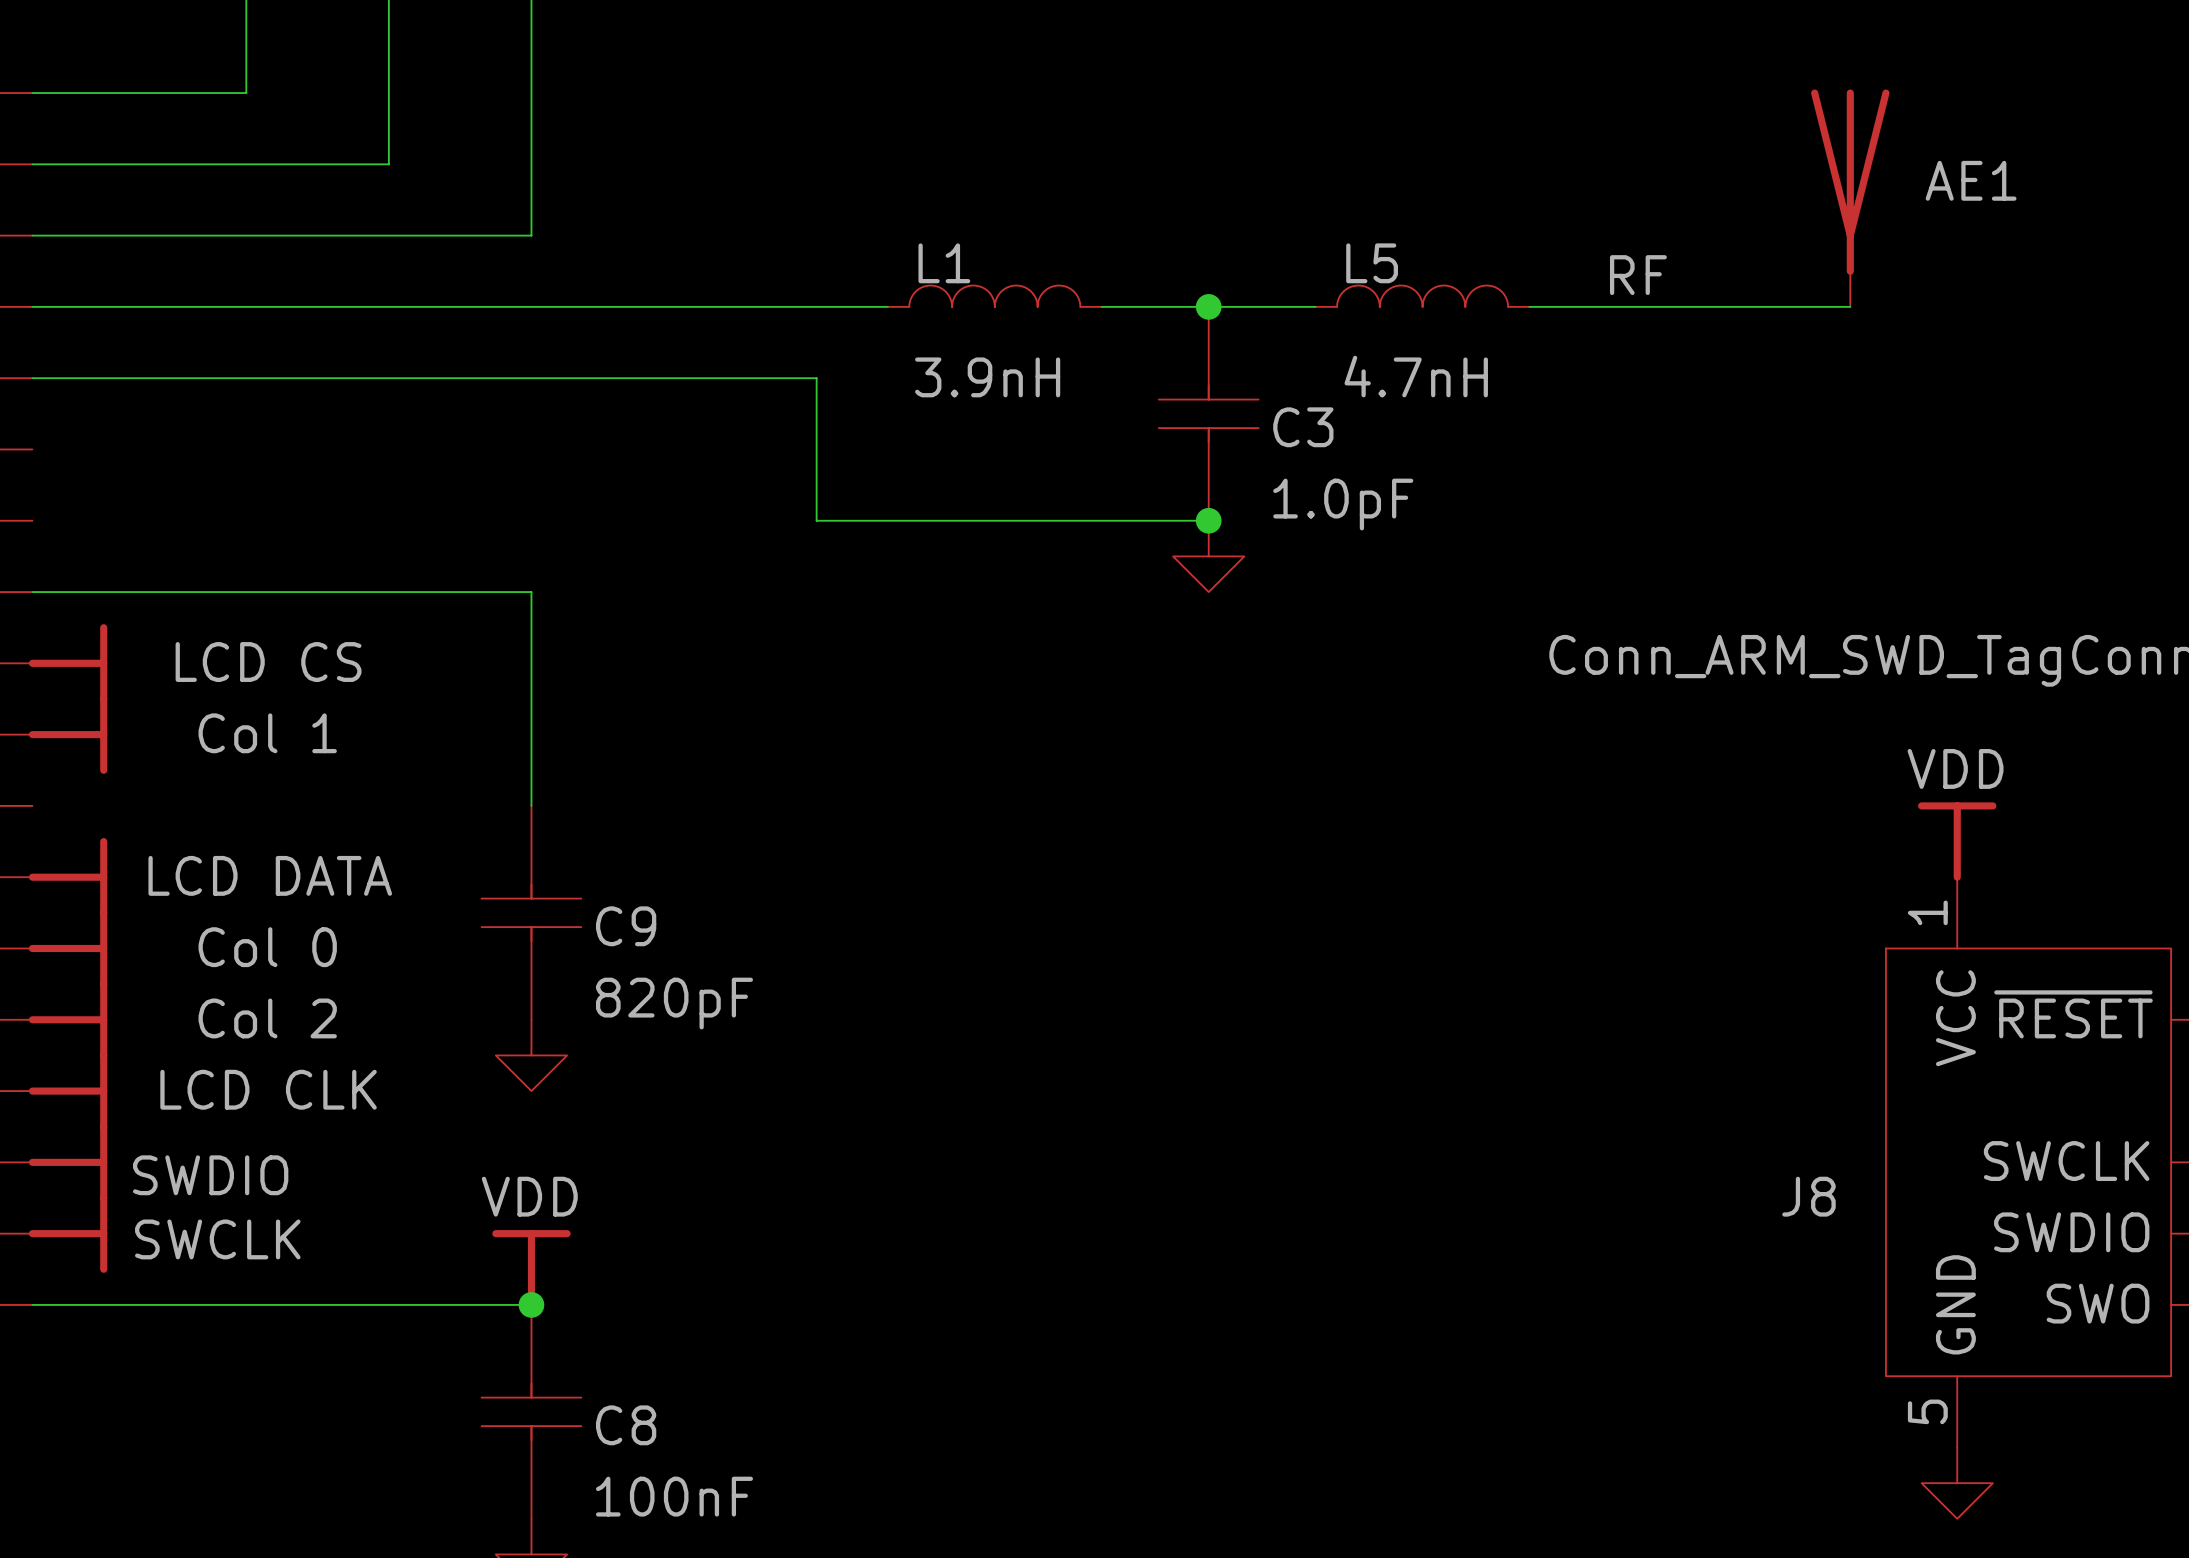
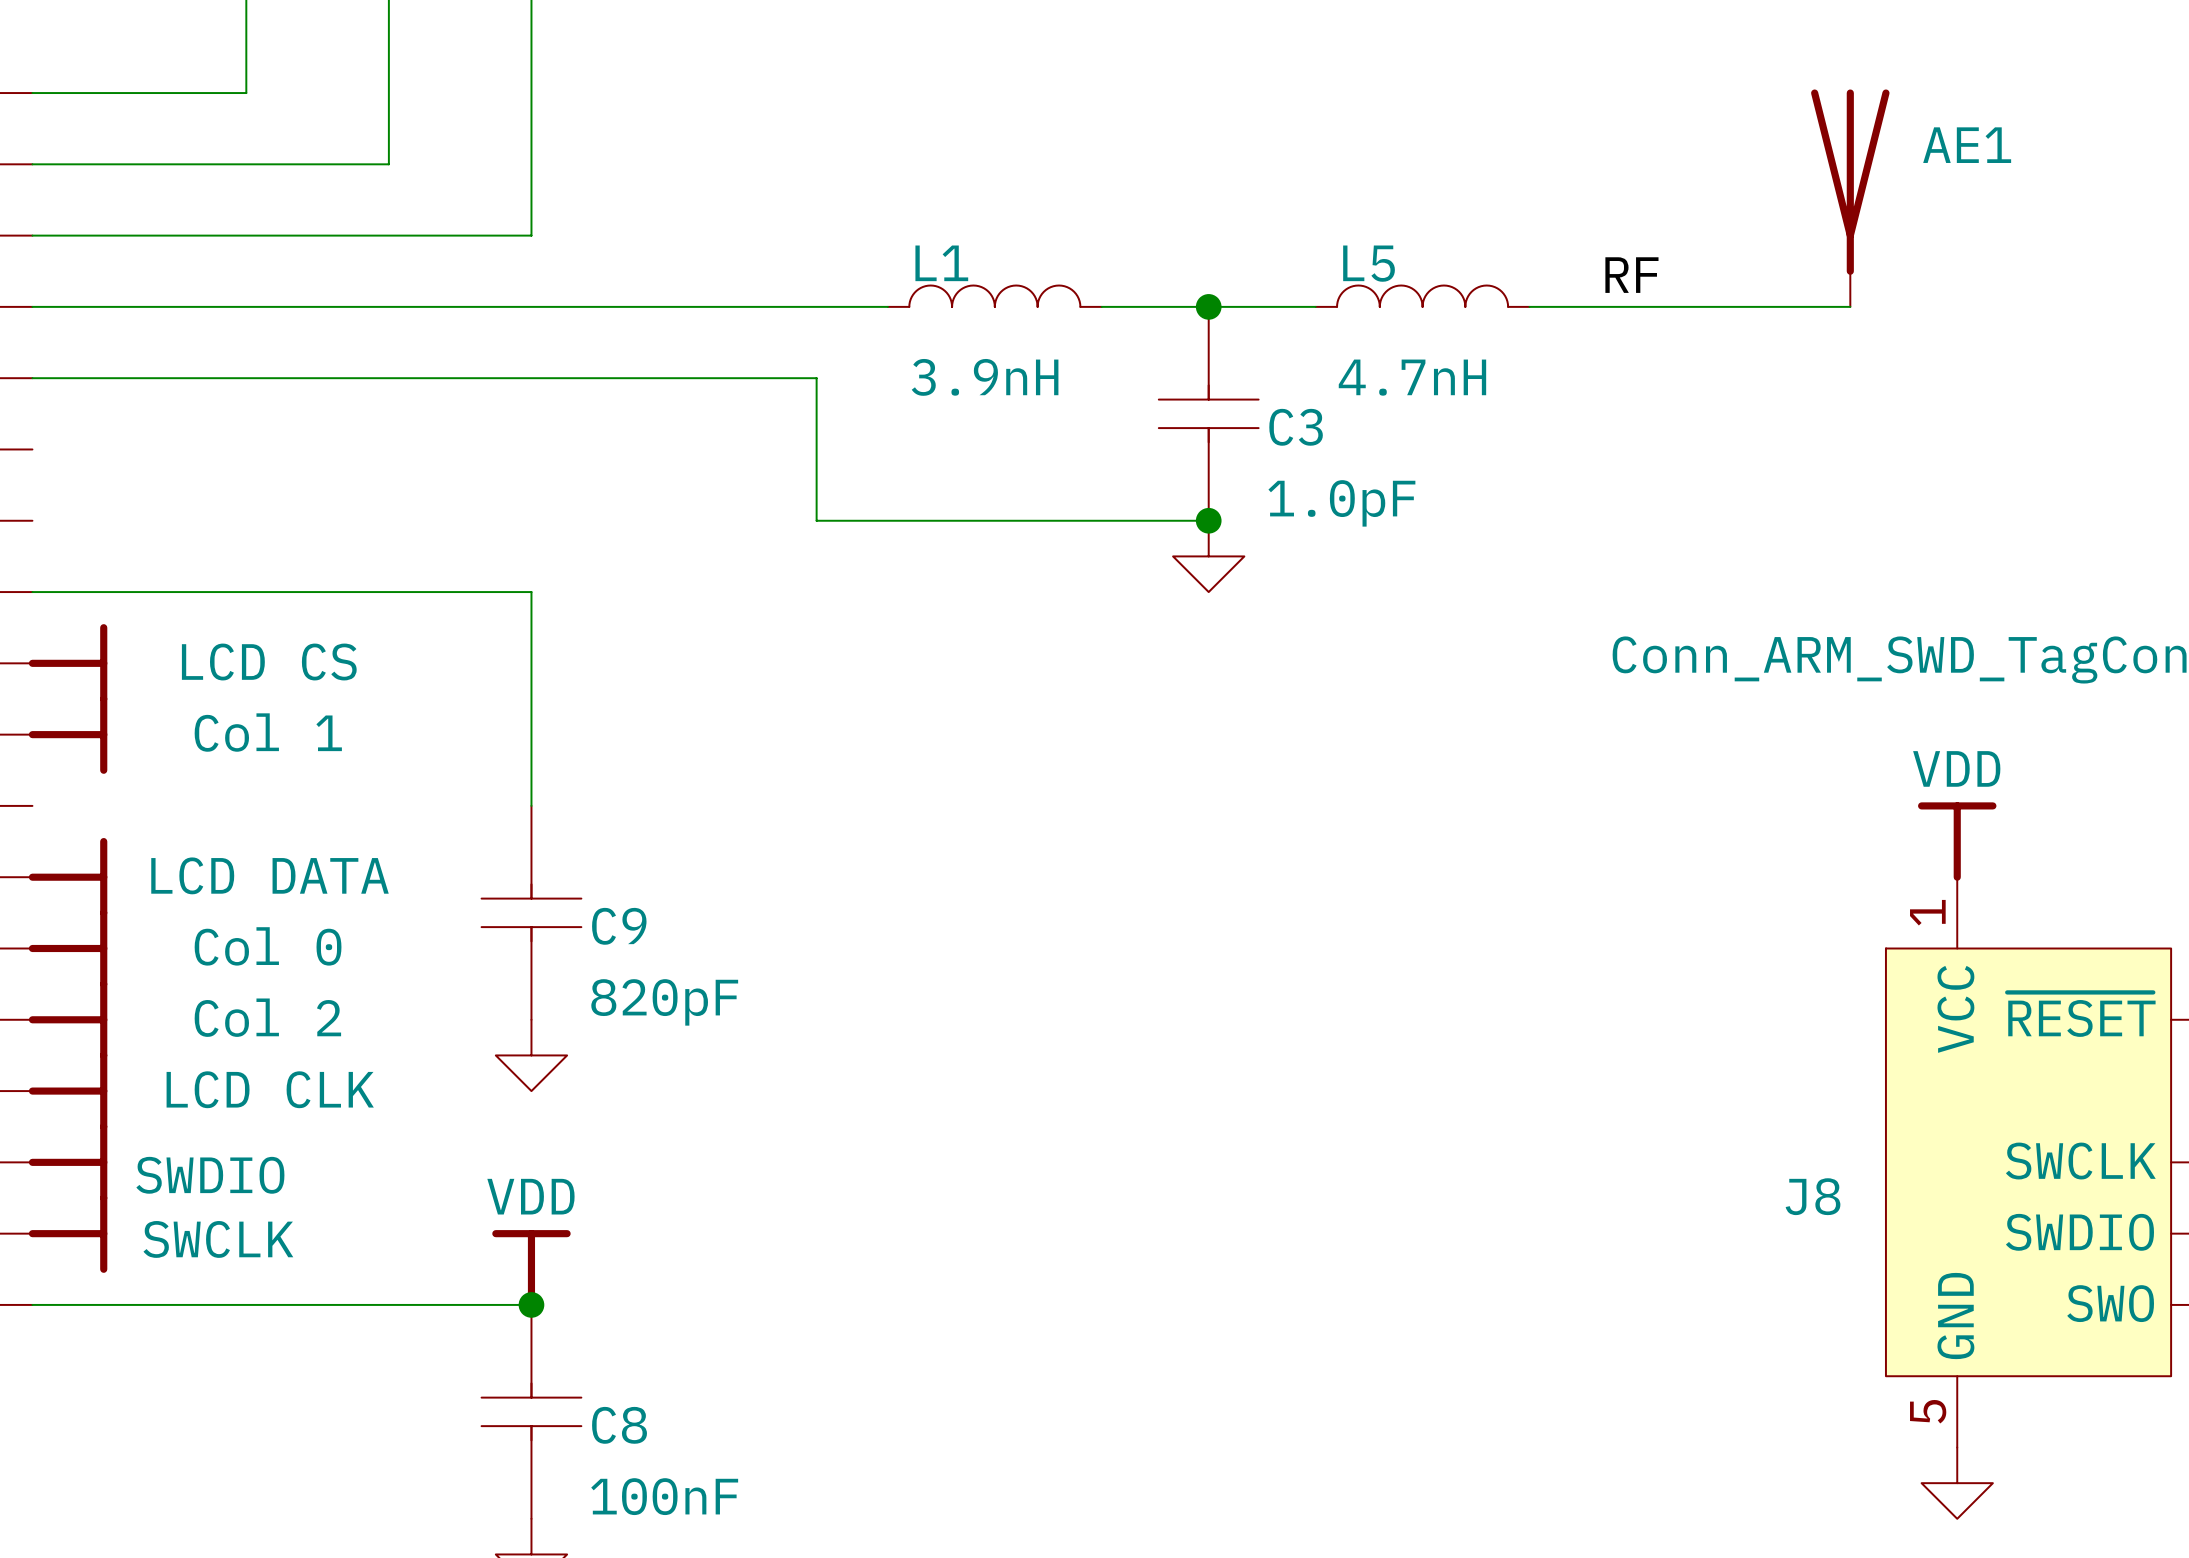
AE1 name position: AE1 (1971, 180) -> AE1 (1967, 145)

